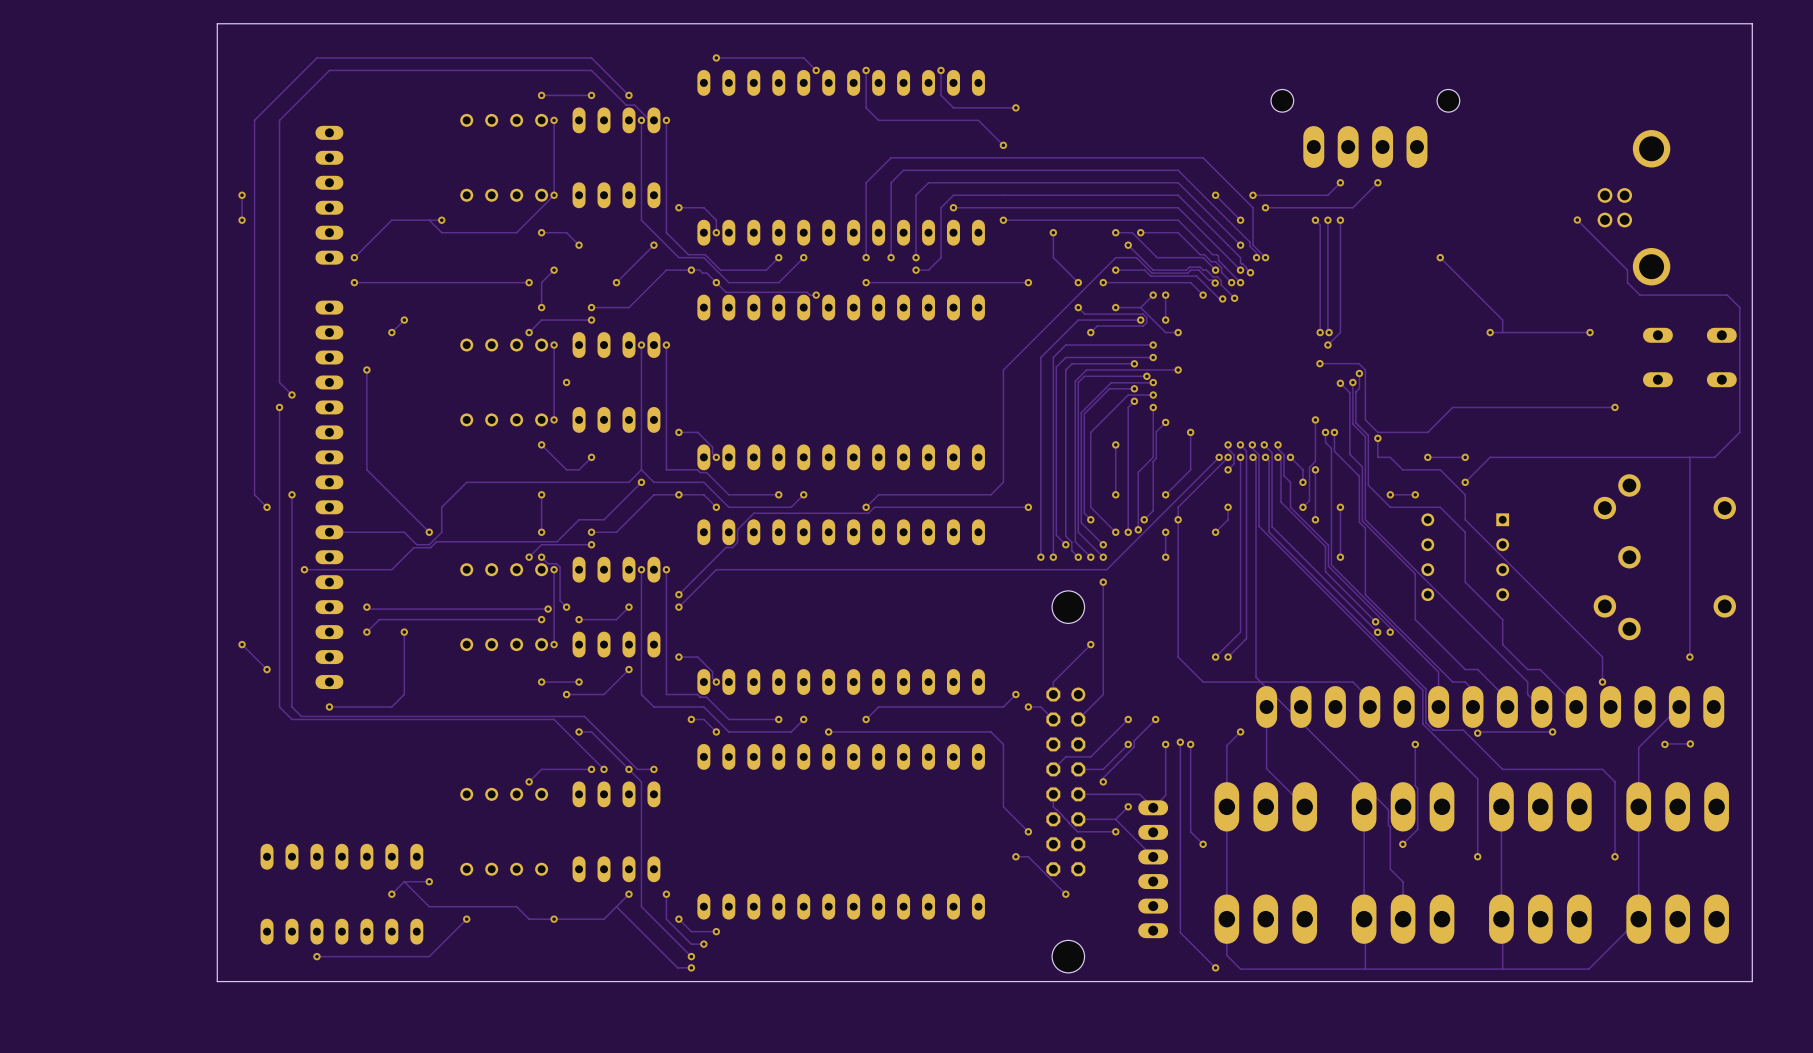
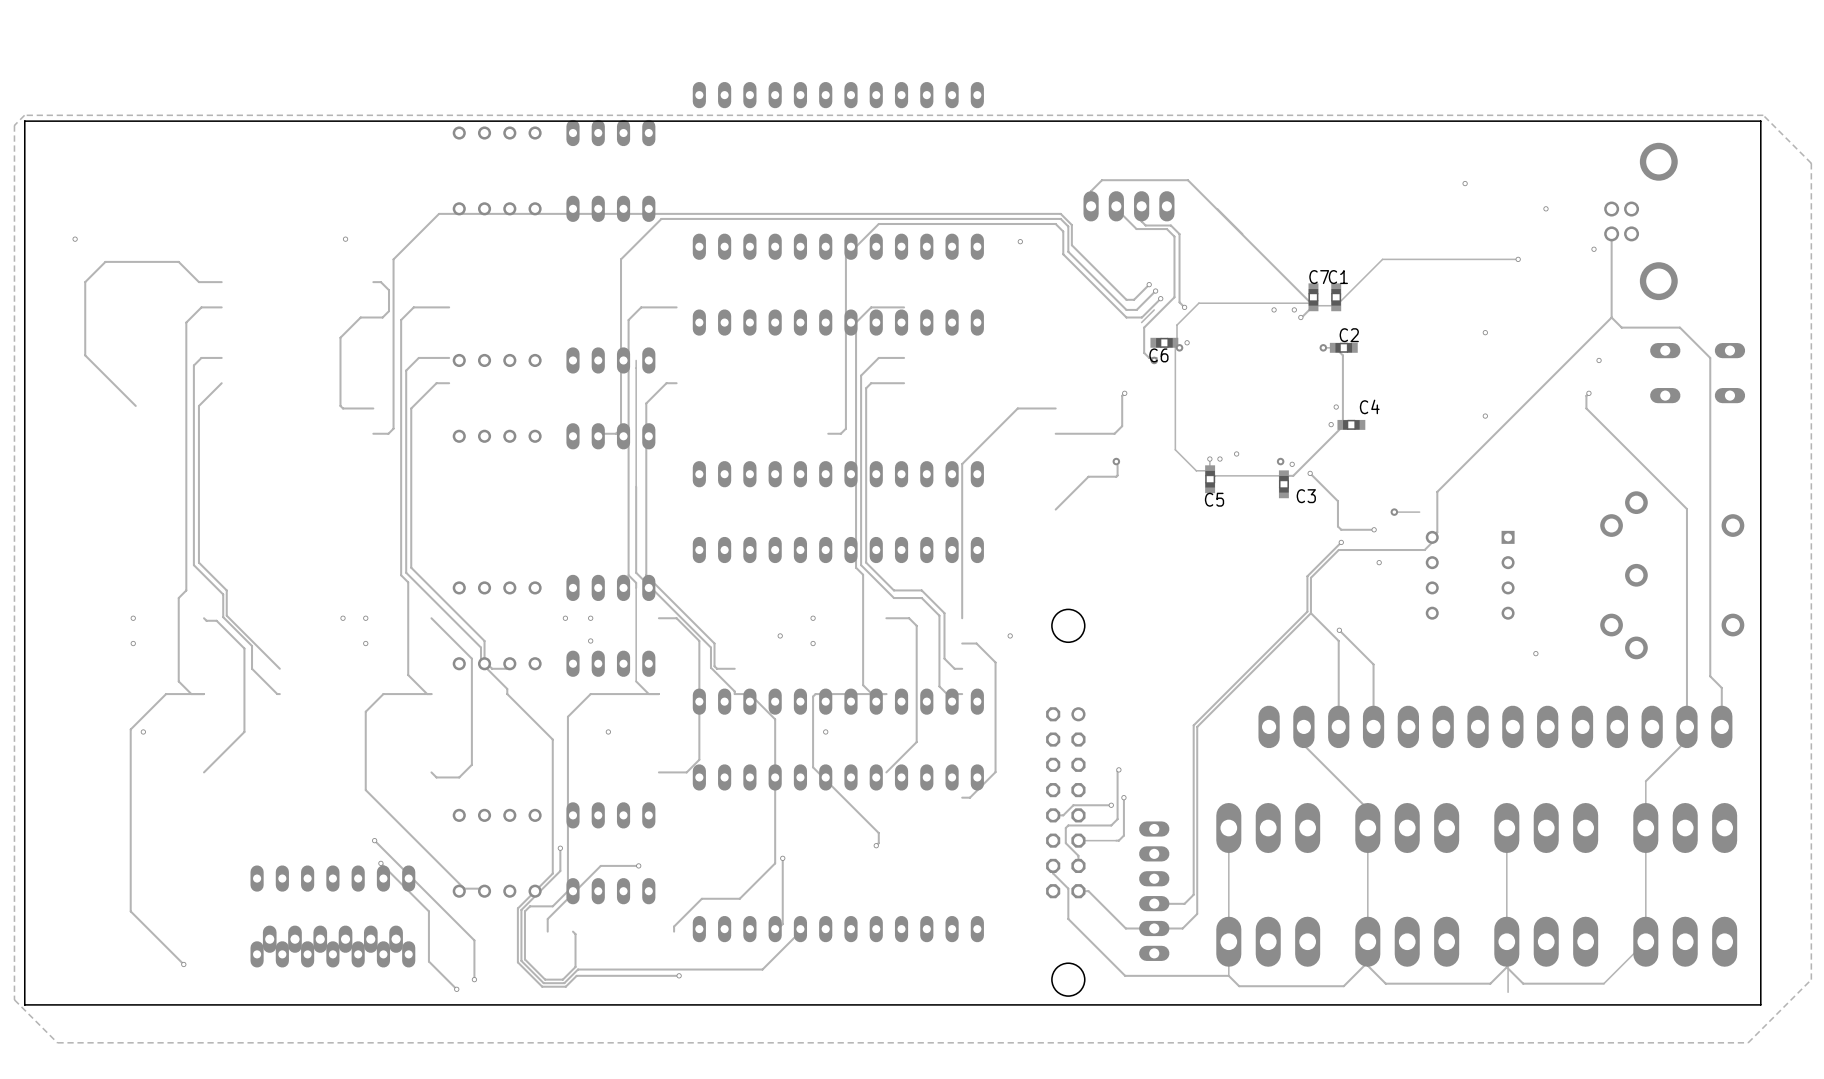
track: (716, 57) (803, 57) (816, 70) -> none
via: (716, 57) -> none
via: (816, 70) -> none
track: (866, 70) (866, 107) (878, 120) (978, 120) (1003, 145) -> none
via: (866, 70) -> none
track: (941, 70) (941, 95) (953, 107) (1015, 107) -> none
via: (941, 70) -> none
via: (541, 95) -> none
track: (591, 95) (541, 95) -> none
via: (591, 95) -> none
track: (628, 95) (591, 57) (316, 57) (254, 120) (254, 494) (267, 507) -> none
via: (628, 95) -> none
zone outline: none -> (1763, 115) (24, 115) (14, 125) (14, 999) (57, 1042) (1748, 1042) (1811, 979) (1811, 163) (1763, 115)
via: (1015, 107) -> none
board edge: (1752, 108) (1752, 23) (217, 23) (217, 981) -> (1760, 121) (24, 121) (24, 1004) (206, 1004)
track: (554, 120) (554, 195) (516, 232) (441, 232) (429, 220) -> none
via: (554, 120) -> none
track: (641, 120) (641, 220) (678, 257) (703, 257) (728, 282) (778, 282) (803, 257) -> none
via: (641, 120) -> none
track: (653, 120) (649, 120) (634, 105) (626, 105) (591, 70) (329, 70) (279, 120) (279, 382) (291, 394) -> none
track: (666, 120) (666, 232) (688, 254) (705, 254) (720, 270) (766, 270) (778, 257) -> none
via: (666, 120) -> none
part: (1365, 128) -> none
via: (1003, 145) -> none
via: none -> (1465, 183)
track: (1340, 182) (1327, 195) (1253, 195) -> none
via: (1340, 182) -> none
track: (1377, 182) (1352, 207) (1265, 207) -> none
via: (1377, 182) -> none
track: none -> (1091, 206) (1091, 191) (1102, 180) (1187, 180) (1313, 305)
track: none -> (1116, 206) (1116, 208) (1136, 229) (1166, 229) (1174, 236) (1174, 297) (1144, 327) (1144, 352) (1149, 357) (1156, 357)
part: none -> (1128, 206)
track: none -> (1141, 206) (1141, 221) (1145, 225) (1170, 225) (1179, 234) (1179, 302) (1184, 307)
track: (242, 195) (242, 220) -> none
via: (242, 195) -> none
part: (329, 195) -> none
via: (554, 195) -> none
via: (1215, 195) -> none
via: (1253, 195) -> none
via: none -> (1545, 208)
track: (678, 207) (703, 207) (716, 220) (716, 232) -> none
via: (678, 207) -> none
track: (953, 207) (1178, 207) (1240, 270) -> none
via: (953, 207) -> none
via: (1265, 207) -> none
via: (242, 220) -> none
track: (441, 220) (391, 220) (354, 257) -> none
via: (441, 220) -> none
track: (1003, 220) (1178, 220) (1212, 254) (1216, 254) (1218, 260) (1224, 266) -> none
via: (1003, 220) -> none
via: (1240, 220) -> none
track: (1315, 220) (1320, 224) (1320, 332) -> (1209, 459) (1209, 470) (1215, 475) (1293, 475) (1342, 426) (1342, 355) (1335, 347) (1323, 347)
via: (1315, 220) -> none
track: (1327, 220) (1329, 332) -> none
via: (1327, 220) -> none
track: (1340, 220) (1340, 332) (1327, 345) -> none
via: (1340, 220) -> none
track: (1577, 220) (1627, 270) (1627, 282) (1639, 295) (1727, 295) (1739, 307) (1739, 432) (1714, 457) (1490, 457) (1465, 482) -> none
via: (1577, 220) -> none
track: none -> (1611, 233) (1611, 317)
via: none -> (75, 239)
via: none -> (345, 239)
via: none -> (1020, 241)
track: (541, 232) (566, 232) (579, 245) -> none
via: (541, 232) -> none
via: (716, 232) -> none
track: (1053, 232) (1053, 257) (1078, 282) -> none
via: (1053, 232) -> none
track: (1115, 232) (1132, 232) (1157, 257) (1203, 257) (1215, 270) -> none
via: (1115, 232) -> none
track: (1140, 232) (1178, 232) (1200, 254) (1204, 254) (1211, 261) (1215, 261) (1221, 267) (1221, 272) (1231, 282) -> none
via: (1140, 232) -> none
via: none -> (1594, 249)
via: (579, 245) -> none
track: (653, 245) (616, 282) -> none
via: (653, 245) -> none
track: (1128, 245) (1153, 270) (1186, 270) (1189, 267) (1200, 267) (1206, 270) (1213, 277) (1217, 277) (1221, 280) (1221, 284) (1234, 298) -> none
via: (1128, 245) -> none
track: (1240, 245) (1178, 182) (928, 182) (916, 195) (916, 257) -> none
via: (1240, 245) -> none
track: none -> (1518, 259) (1382, 259) (1336, 305) (1313, 305)
via: none -> (1518, 259)
via: (354, 257) -> none
via: (778, 257) -> none
via: (803, 257) -> none
via: (866, 257) -> none
via: (891, 257) -> none
via: (916, 257) -> none
track: (1256, 257) (1256, 252) (1250, 246) (1250, 242) (1178, 170) (903, 170) (891, 182) (891, 257) -> none
via: (1256, 257) -> none
track: (1265, 257) (1253, 245) (1253, 207) (1203, 157) (891, 157) (866, 182) (866, 257) -> none
via: (1265, 257) -> none
track: (1440, 257) (1502, 320) (1502, 332) -> none
via: (1440, 257) -> none
track: (1224, 266) (1240, 282) -> none
track: none -> (221, 282) (198, 282) (178, 261) (105, 261) (85, 282) (85, 355) (135, 405)
track: none -> (373, 282) (380, 282) (389, 290) (389, 311) (382, 317) (360, 317) (340, 337) (340, 405) (343, 408) (373, 408)
track: (554, 270) (541, 282) (541, 307) -> none
via: (554, 270) -> none
via: (691, 270) -> none
track: (916, 270) (928, 270) (941, 257) (941, 207) (953, 195) (1178, 195) (1240, 257) (1240, 262) (1250, 272) -> none
via: (916, 270) -> none
track: (1115, 270) (1144, 270) (1150, 276) (1196, 276) (1219, 298) (1222, 298) -> none
via: (1115, 270) -> none
track: none -> (1149, 284) (1134, 299) (1126, 299) (1071, 245) (1071, 225) (1060, 213) (439, 213) (393, 259) (393, 428) (388, 433) (373, 433)
via: none -> (1149, 284)
via: (1215, 270) -> none
via: (1240, 270) -> none
via: (1250, 272) -> none
track: none -> (1155, 291) (1136, 309) (1126, 309) (1068, 251) (1068, 226) (1060, 218) (661, 218) (621, 259) (621, 428) (615, 433) (600, 433)
via: none -> (1155, 291)
via: (354, 282) -> none
track: (529, 282) (354, 282) -> none
via: (529, 282) -> none
via: (616, 282) -> none
via: (716, 282) -> none
via: (866, 282) -> none
track: (1028, 282) (866, 282) -> none
via: (1028, 282) -> none
via: (1078, 282) -> none
track: (1103, 282) (1190, 282) (1203, 295) -> none
via: (1103, 282) -> none
via: (1231, 282) -> none
via: (1240, 282) -> none
C7: none -> (1313, 297)
C1: none -> (1336, 297)
track: (1215, 283) (1208, 280) (1198, 270) (1190, 270) (1187, 273) (1151, 273) (1136, 257) (1115, 257) (1003, 369) (1003, 482) (990, 494) (878, 494) (866, 507) -> none
via: (1215, 283) -> none
track: none -> (1160, 298) (1141, 317) (1126, 317) (1063, 254) (1063, 231) (1055, 223) (878, 223) (845, 256) (845, 428) (840, 433) (828, 433)
via: none -> (1160, 298)
track: none -> (1313, 305) (1310, 303) (1198, 303) (1177, 325) (1177, 338) (1172, 342) (1175, 345) (1175, 449) (1196, 470) (1210, 470)
track: none -> (1313, 305) (1300, 317)
track: none -> (221, 307) (201, 307) (186, 322) (186, 590) (178, 598) (178, 681) (191, 694)
track: none -> (449, 307) (413, 307) (401, 320) (401, 575) (408, 582) (408, 675) (427, 694)
track: none -> (676, 307) (641, 307) (628, 320) (628, 575) (636, 582) (636, 587)
track: none -> (904, 307) (871, 307) (856, 322) (856, 567) (863, 574) (863, 685) (871, 694)
via: none -> (1184, 307)
track: (816, 295) (810, 295) (807, 292) (726, 292) (706, 273) (702, 273) (699, 270) (666, 270) (628, 307) (591, 307) -> none
via: (816, 295) -> none
via: (1153, 295) -> none
track: (1165, 295) (1165, 320) -> none
via: (1165, 295) -> none
via: (1203, 295) -> none
via: none -> (1274, 309)
via: none -> (1294, 309)
via: (1222, 298) -> none
via: (1234, 298) -> none
via: none -> (1300, 317)
track: none -> (1611, 317) (1437, 491) (1437, 532) (1432, 537) (1432, 542) (1424, 550) (1338, 550) (1310, 577) (1310, 613)
track: none -> (1611, 317) (1621, 327) (1679, 327) (1710, 357) (1710, 676) (1721, 687) (1721, 726)
via: (541, 307) -> none
via: (591, 307) -> none
track: (1078, 307) (1084, 314) (1143, 314) (1146, 317) (1146, 322) (1143, 326) (1097, 326) (1090, 332) -> none
via: (1078, 307) -> none
track: (1115, 307) (1140, 307) (1165, 332) (1178, 332) -> none
via: (1115, 307) -> none
via: none -> (1485, 332)
track: (404, 320) (391, 332) -> none
via: (404, 320) -> none
track: (591, 320) (541, 320) (529, 332) -> none
via: (591, 320) -> none
track: (1140, 320) (1078, 320) (1040, 357) (1040, 557) -> none
via: (1140, 320) -> none
via: (1165, 320) -> none
C6: none -> (1164, 342)
via: none -> (1187, 342)
via: (391, 332) -> none
via: (529, 332) -> none
via: (1090, 332) -> none
via: (1329, 332) -> none
C2: none -> (1343, 347)
via: (1490, 332) -> none
track: (1590, 332) (1490, 332) -> none
via: (1590, 332) -> none
track: none -> (221, 357) (201, 357) (193, 365) (193, 565) (223, 594) (223, 617) (252, 645) (252, 668) (277, 694) (279, 694)
track: none -> (449, 357) (418, 357) (406, 370) (406, 572) (480, 647) (480, 662) (507, 688) (507, 694) (552, 739) (552, 873) (517, 908) (517, 962) (542, 986) (565, 986) (576, 975) (679, 975)
track: none -> (904, 357) (878, 357) (861, 375) (861, 565) (893, 598) (921, 598) (939, 615) (939, 686) (947, 694) (962, 694)
track: (554, 345) (554, 419) -> none
via: (554, 345) -> none
via: (641, 345) -> none
track: (666, 345) (666, 469) (697, 469) (700, 472) (706, 472) (728, 494) (778, 494) -> none
via: (666, 345) -> none
track: (1153, 345) (1065, 345) (1053, 357) (1053, 557) -> none
via: (1327, 345) -> none
via: none -> (1599, 360)
track: (1153, 357) (1065, 357) (1056, 367) (1056, 535) (1065, 544) -> none
via: (1153, 357) -> none
track: (1134, 363) (1071, 363) (1065, 369) (1065, 536) (1071, 542) (1071, 550) (1078, 557) -> none
via: (1134, 363) -> none
track: (1319, 363) (1359, 363) (1365, 369) (1365, 419) (1377, 432) (1427, 432) (1452, 407) (1615, 407) -> none
via: (1319, 363) -> none
track: none -> (221, 383) (198, 405) (198, 562) (226, 590) (226, 615) (279, 668)
track: none -> (449, 383) (436, 383) (411, 408) (411, 567) (484, 640) (484, 661) (492, 668) (507, 668)
track: none -> (676, 383) (666, 383) (646, 403) (646, 575) (714, 643) (714, 666) (717, 668) (734, 668)
track: none -> (904, 383) (871, 383) (866, 388) (866, 562) (893, 590) (921, 590) (944, 613) (944, 658) (954, 668) (962, 668)
track: (366, 369) (366, 469) (429, 532) -> none
via: (366, 369) -> none
track: (1178, 369) (1086, 369) (1075, 381) (1075, 541) (1090, 557) -> none
via: (1178, 369) -> none
track: (1359, 373) (1359, 388) (1355, 391) (1355, 422) (1368, 435) (1368, 485) (1390, 507) (1440, 507) (1465, 532) (1465, 582) (1502, 619) (1502, 644) (1527, 669) (1540, 669) (1576, 706) -> none
via: (1359, 373) -> none
track: (1146, 376) (1084, 376) (1078, 382) (1078, 532) (1103, 557) -> none
via: (1146, 376) -> none
track: none -> (1124, 393) (1122, 395) (1122, 426) (1114, 433) (1055, 433)
via: none -> (1124, 393)
via: none -> (1588, 393)
via: (566, 382) -> none
track: (1153, 382) (1111, 382) (1081, 412) (1081, 522) (1103, 544) -> none
via: (1153, 382) -> none
track: (1352, 382) (1352, 424) (1365, 436) (1365, 519) (1527, 682) (1527, 694) (1541, 706) -> none
via: (1352, 382) -> none
track: (1340, 383) (1349, 392) (1349, 454) (1362, 466) (1362, 521) (1415, 573) (1415, 619) (1465, 669) (1477, 669) (1507, 699) (1507, 706) -> none
via: (1340, 383) -> none
track: (1134, 388) (1109, 388) (1084, 413) (1084, 513) (1090, 519) -> none
via: (1134, 388) -> none
via: none -> (1336, 407)
track: none -> (1055, 408) (1017, 408) (962, 464) (962, 618)
via: (291, 394) -> none
track: (1153, 395) (1128, 395) (1090, 432) (1090, 507) (1115, 532) -> none
via: (1153, 395) -> none
via: none -> (1485, 416)
track: (1134, 401) (1128, 407) (1128, 532) -> none
via: (1134, 401) -> none
track: (279, 407) (279, 706) (291, 719) (554, 719) (604, 769) -> none
via: (279, 407) -> none
track: (1153, 407) (1153, 457) (1138, 472) (1138, 529) -> none
via: (1153, 407) -> none
via: (1615, 407) -> none
via: none -> (1331, 424)
C4: none -> (1351, 424)
via: (554, 419) -> none
track: (1315, 419) (1315, 461) (1309, 467) (1309, 500) (1302, 507) -> none
via: (1315, 419) -> none
track: (1165, 422) (1156, 431) (1156, 458) (1153, 461) (1153, 510) (1144, 519) -> none
via: (1165, 422) -> none
track: (678, 432) (697, 432) (712, 447) (712, 453) (716, 457) -> none
via: (678, 432) -> none
track: (1190, 432) (1190, 469) (1165, 494) -> none
via: (1190, 432) -> none
track: (1325, 432) (1325, 442) (1331, 448) (1331, 564) (1438, 672) (1438, 706) -> none
via: (1325, 432) -> none
track: (1334, 432) (1334, 451) (1359, 476) (1359, 522) (1365, 528) (1365, 594) (1452, 682) (1465, 682) (1472, 689) (1472, 706) -> none
via: (1334, 432) -> none
via: none -> (1236, 453)
track: (1377, 438) (1377, 457) (1390, 457) (1402, 469) (1440, 469) (1465, 494) (1465, 519) (1602, 657) (1602, 682) -> none
via: (1377, 438) -> none
via: none -> (1209, 459)
via: none -> (1219, 459)
track: (541, 444) (566, 469) (579, 469) (591, 457) -> none
via: (541, 444) -> none
track: (1115, 444) (1115, 494) -> none
track: (1228, 444) (1228, 448) (1234, 454) (1234, 463) (1228, 469) -> none
via: (1228, 444) -> none
track: (1240, 444) (1246, 450) (1246, 638) (1228, 657) -> none
via: (1240, 444) -> none
track: (1252, 444) (1252, 448) (1259, 454) (1259, 526) (1422, 690) (1422, 723) (1477, 778) (1477, 856) -> none
via: (1252, 444) -> none
track: (1264, 444) (1272, 452) (1272, 526) (1377, 632) -> none
via: (1264, 444) -> none
track: (1278, 444) (1278, 448) (1283, 454) (1283, 475) (1290, 482) (1290, 507) (1328, 545) (1328, 566) (1390, 628) (1390, 632) -> none
via: none -> (1292, 464)
track: none -> (1117, 465) (1116, 476) (1088, 476) (1055, 509)
track: none -> (1310, 473) (1337, 501) (1337, 526) (1341, 529) (1374, 529)
via: none -> (1310, 473)
via: (591, 457) -> none
via: (716, 457) -> none
track: (1219, 457) (1106, 569) (716, 569) (678, 607) -> none
via: (1219, 457) -> none
track: (1228, 457) (1178, 507) (1178, 657) (1203, 682) (1352, 682) (1369, 698) -> (1339, 630) (1373, 664) (1373, 718)
via: (1228, 457) -> none
track: (1240, 457) (1240, 632) (1215, 657) -> none
via: (1240, 457) -> none
track: (1253, 457) (1256, 460) (1256, 677) (1388, 809) (1390, 869) (1403, 881) (1403, 919) -> none
via: (1253, 457) -> none
track: (1265, 457) (1269, 460) (1269, 532) (1425, 688) (1425, 722) (1433, 730) (1463, 730) (1502, 769) (1602, 769) (1615, 781) (1615, 856) -> none
via: (1265, 457) -> none
track: (1278, 457) (1280, 460) (1280, 502) (1325, 546) (1325, 571) (1375, 621) -> none
via: (1278, 457) -> none
track: (1290, 457) (1302, 469) (1302, 482) -> none
via: (1290, 457) -> none
via: (1427, 457) -> none
track: (1465, 457) (1427, 457) -> none
via: (1465, 457) -> none
track: (1689, 457) (1689, 657) -> none
C5: none -> (1210, 479)
C3: none -> (1283, 484)
track: none -> (636, 486) (636, 572) (710, 647) (710, 667) (734, 691) (734, 694) (749, 694) (775, 719) (775, 863) (739, 898) (701, 898) (674, 926) (674, 931)
via: (1228, 469) -> none
track: (1315, 469) (1315, 519) -> none
via: (1315, 469) -> none
track: (641, 482) (604, 519) (579, 519) (557, 541) (436, 541) (430, 547) (413, 547) (391, 569) (304, 569) -> none
via: (641, 482) -> none
via: (1302, 482) -> none
via: (1465, 482) -> none
track: (291, 494) (291, 706) (301, 716) (584, 716) (637, 769) (653, 769) -> none
via: (291, 494) -> none
part: (329, 494) -> none
track: (541, 494) (541, 532) -> none
via: (541, 494) -> none
via: (678, 494) -> none
via: (778, 494) -> none
track: (803, 494) (791, 507) (728, 507) (703, 482) (653, 482) (641, 469) (628, 482) (466, 482) (441, 507) (441, 532) (429, 544) (416, 544) (404, 532) (329, 532) -> none
via: (803, 494) -> none
via: (1115, 494) -> none
via: (1165, 494) -> none
via: (1415, 494) -> none
via: (267, 507) -> none
track: (716, 507) (703, 494) (653, 494) (616, 532) (591, 532) -> none
via: (716, 507) -> none
via: (866, 507) -> none
track: (1028, 507) (874, 507) (868, 513) (753, 513) (737, 529) (737, 542) (732, 547) (726, 547) (678, 594) -> none
via: (1028, 507) -> none
track: (1228, 507) (1228, 519) (1215, 532) -> none
via: (1228, 507) -> none
via: (1302, 507) -> none
track: (1340, 507) (1340, 557) -> none
via: (1340, 507) -> none
via: none -> (1374, 529)
via: (1090, 519) -> none
via: (1144, 519) -> none
via: (1178, 519) -> none
via: (1315, 519) -> none
track: none -> (1341, 542) (1307, 576) (1307, 611) (1193, 725) (1193, 894) (1184, 903) (1154, 903)
via: none -> (1341, 542)
via: (1138, 529) -> none
via: (429, 532) -> none
via: (541, 532) -> none
via: (591, 532) -> none
via: (1115, 532) -> none
via: (1128, 532) -> none
track: (1165, 532) (1165, 557) -> none
via: (1165, 532) -> none
via: (1215, 532) -> none
track: (591, 544) (541, 544) (529, 557) -> none
via: (591, 544) -> none
via: (1065, 544) -> none
via: (1103, 544) -> none
via: none -> (1379, 562)
via: (529, 557) -> none
track: (541, 557) (548, 563) (556, 563) (560, 567) (560, 600) (566, 607) -> none
via: (541, 557) -> none
via: (1040, 557) -> none
via: (1053, 557) -> none
via: (1078, 557) -> none
via: (1090, 557) -> none
via: (1103, 557) -> none
via: (1165, 557) -> none
via: (1340, 557) -> none
via: (304, 569) -> none
track: (554, 569) (554, 644) -> none
via: (554, 569) -> none
via: (641, 569) -> none
track: (666, 569) (666, 694) (697, 694) (700, 697) (706, 697) (728, 719) (778, 719) -> none
via: (666, 569) -> none
track: (1103, 582) (1103, 694) (1078, 719) -> none
via: (1103, 582) -> none
via: (678, 594) -> none
track: none -> (1310, 613) (1338, 640) (1338, 726)
track: none -> (1310, 613) (1197, 726) (1197, 913) (1182, 928) (1125, 928) (1088, 891) (1078, 891)
via: none -> (133, 618)
track: none -> (204, 618) (206, 620) (216, 620) (244, 648) (244, 731) (204, 772)
via: none -> (343, 618)
via: none -> (365, 618)
track: none -> (431, 618) (471, 658) (471, 764) (459, 777) (436, 777) (431, 772)
via: none -> (565, 618)
via: none -> (590, 618)
track: none -> (658, 618) (676, 618) (699, 640) (699, 759) (686, 772) (658, 772)
via: none -> (813, 618)
track: none -> (886, 618) (909, 618) (916, 625) (916, 742) (886, 772)
track: (366, 607) (368, 609) (548, 609) -> none
via: (366, 607) -> none
via: (566, 607) -> none
track: (628, 607) (616, 619) (579, 619) -> none
via: (628, 607) -> none
via: (678, 607) -> none
via: (548, 609) -> none
via: none -> (1339, 630)
via: none -> (780, 635)
via: none -> (1010, 635)
track: (541, 619) (379, 619) (366, 632) -> none
via: (541, 619) -> none
via: (579, 619) -> none
via: (1375, 621) -> none
via: none -> (590, 640)
via: none -> (133, 643)
via: none -> (365, 643)
via: none -> (813, 643)
track: none -> (962, 643) (976, 643) (995, 662) (995, 772) (970, 797) (962, 797)
via: (366, 632) -> none
track: (404, 632) (404, 694) (391, 706) (329, 706) -> none
via: (404, 632) -> none
via: (1377, 632) -> none
via: (1390, 632) -> none
via: none -> (1535, 653)
track: (242, 644) (267, 669) -> none
via: (242, 644) -> none
via: (554, 644) -> none
track: (1090, 644) (1053, 682) (1053, 694) -> none
via: (1090, 644) -> none
track: (678, 657) (697, 657) (712, 671) (712, 678) (716, 682) -> none
via: (678, 657) -> none
via: (1215, 657) -> none
via: (1228, 657) -> none
via: (1689, 657) -> none
track: (641, 662) (641, 694) (653, 706) (703, 706) (728, 731) (791, 731) (803, 719) -> (636, 681) (648, 694)
via: (267, 669) -> none
track: (628, 669) (604, 694) (566, 694) -> none
via: (628, 669) -> none
track: none -> (204, 694) (166, 694) (130, 729) (130, 911) (183, 964)
track: none -> (431, 694) (383, 694) (365, 711) (365, 790) (464, 888) (482, 888)
track: none -> (658, 694) (590, 694) (567, 716) (567, 891) (552, 906) (530, 906) (524, 911) (524, 959) (545, 979) (562, 979) (575, 967) (575, 934) (572, 931)
track: none -> (886, 694) (815, 694) (813, 696) (813, 767) (878, 833) (878, 843) (876, 845)
via: (541, 682) -> none
track: (579, 682) (541, 682) -> none
via: (579, 682) -> none
via: (716, 682) -> none
via: (1602, 682) -> none
via: (566, 694) -> none
track: (1015, 694) (1003, 706) (878, 706) (866, 719) -> none
via: (1015, 694) -> none
via: (329, 706) -> none
track: (1028, 706) (1040, 706) (1053, 719) -> none
via: (1028, 706) -> none
track: (1266, 706) (1266, 768) (1304, 806) -> none
track: none -> (1303, 726) (1303, 744) (1367, 809) (1367, 828)
track: (1679, 706) (1638, 747) (1638, 760) -> (1588, 393) (1586, 395) (1586, 408) (1686, 509) (1686, 740) (1645, 781)
via: none -> (143, 731)
via: none -> (608, 731)
via: none -> (825, 731)
track: (691, 719) (703, 719) (716, 731) -> none
via: (691, 719) -> none
via: (778, 719) -> none
via: (803, 719) -> none
via: (866, 719) -> none
track: (1128, 719) (1090, 756) (1065, 756) (1053, 769) -> none
via: (1128, 719) -> none
track: (1155, 719) (1134, 740) (1134, 746) (1103, 777) (1103, 781) -> none
via: (1155, 719) -> none
track: (579, 731) (591, 731) (641, 781) (641, 906) (691, 956) -> none
via: (579, 731) -> none
via: (716, 731) -> none
track: (828, 731) (990, 731) (1003, 744) (1003, 806) (1028, 831) -> none
via: (828, 731) -> none
track: (1240, 731) (1226, 745) (1226, 806) -> none
via: (1240, 731) -> none
track: (1552, 731) (1477, 733) -> none
via: (1552, 731) -> none
via: (1477, 733) -> none
track: (1180, 742) (1180, 932) (1215, 967) -> none
via: (1180, 742) -> none
track: (1690, 743) (1664, 744) -> none
via: (1690, 743) -> none
track: (1128, 744) (1103, 769) (1078, 769) -> none
via: (1128, 744) -> none
track: (1165, 744) (1165, 795) (1153, 807) (1139, 794) (1078, 794) -> none
via: (1165, 744) -> none
track: (1190, 744) (1190, 831) (1203, 844) -> none
via: (1190, 744) -> none
track: (1415, 744) (1417, 829) (1402, 844) -> none
via: (1415, 744) -> none
via: (1664, 744) -> none
track: none -> (1118, 769) (1117, 819) (1111, 825) (1068, 825) (1065, 828) (1065, 843) (1078, 855) (1078, 865)
via: none -> (1118, 769)
track: (591, 769) (541, 769) (529, 781) -> none
via: (591, 769) -> none
via: (604, 769) -> none
via: (628, 769) -> none
via: (653, 769) -> none
track: none -> (1123, 797) (1123, 835) (1116, 840)
via: none -> (1123, 797)
via: (529, 781) -> none
via: (1103, 781) -> none
via: none -> (1111, 805)
track: (1053, 794) (1053, 806) (1077, 831) (1115, 831) -> (1053, 815) (1063, 815) (1073, 805) (1111, 805)
track: (1128, 806) (1115, 819) (1153, 856) -> none
via: (1128, 806) -> none
track: none -> (374, 840) (474, 940) (474, 979)
via: none -> (374, 840)
via: none -> (876, 845)
track: none -> (560, 848) (560, 871) (521, 909) (521, 960) (543, 983) (564, 983) (577, 969) (762, 969) (800, 931)
via: none -> (560, 848)
via: (1028, 831) -> none
via: (1115, 831) -> none
track: none -> (782, 858) (782, 924) (775, 931)
via: none -> (782, 858)
track: none -> (380, 863) (428, 911) (428, 961) (456, 989)
via: none -> (380, 863)
track: none -> (638, 865) (600, 865) (547, 918) (547, 931)
via: none -> (638, 865)
track: none -> (1053, 865) (1053, 873) (1068, 888) (1068, 918) (1125, 975) (1228, 975) (1239, 986) (1343, 986) (1367, 962)
via: (1203, 844) -> none
via: (1402, 844) -> none
track: (1015, 856) (1028, 856) (1065, 894) -> none
via: (1015, 856) -> none
via: (1477, 856) -> none
via: (1615, 856) -> none
track: (404, 881) (391, 894) -> none
track: (404, 881) (429, 906) (516, 906) (529, 919) (604, 919) (628, 894) -> none
track: (429, 881) (404, 881) -> none
via: (429, 881) -> none
via: (391, 894) -> none
via: (628, 894) -> none
track: (666, 894) (666, 919) (691, 944) (703, 944) -> none
via: (666, 894) -> none
via: (1065, 894) -> none
track: (616, 906) (677, 967) (691, 967) -> none
part: none -> (332, 939)
track: (466, 919) (429, 956) (316, 956) -> none
via: (466, 919) -> none
via: (554, 919) -> none
track: (678, 919) (691, 931) (716, 931) -> none
via: (678, 919) -> none
track: (1364, 919) (1365, 969) -> none
via: (716, 931) -> none
via: none -> (183, 964)
via: (703, 944) -> none
via: none -> (679, 975)
track: (1226, 952) (1226, 955) (1240, 969) (1588, 969) (1597, 960) -> (1367, 941) (1367, 965) (1385, 983) (1490, 983) (1506, 967) (1523, 983) (1603, 983)
via: (316, 956) -> none
via: none -> (474, 979)
via: (691, 956) -> none
via: none -> (456, 989)
via: (691, 967) -> none
via: (1215, 967) -> none

